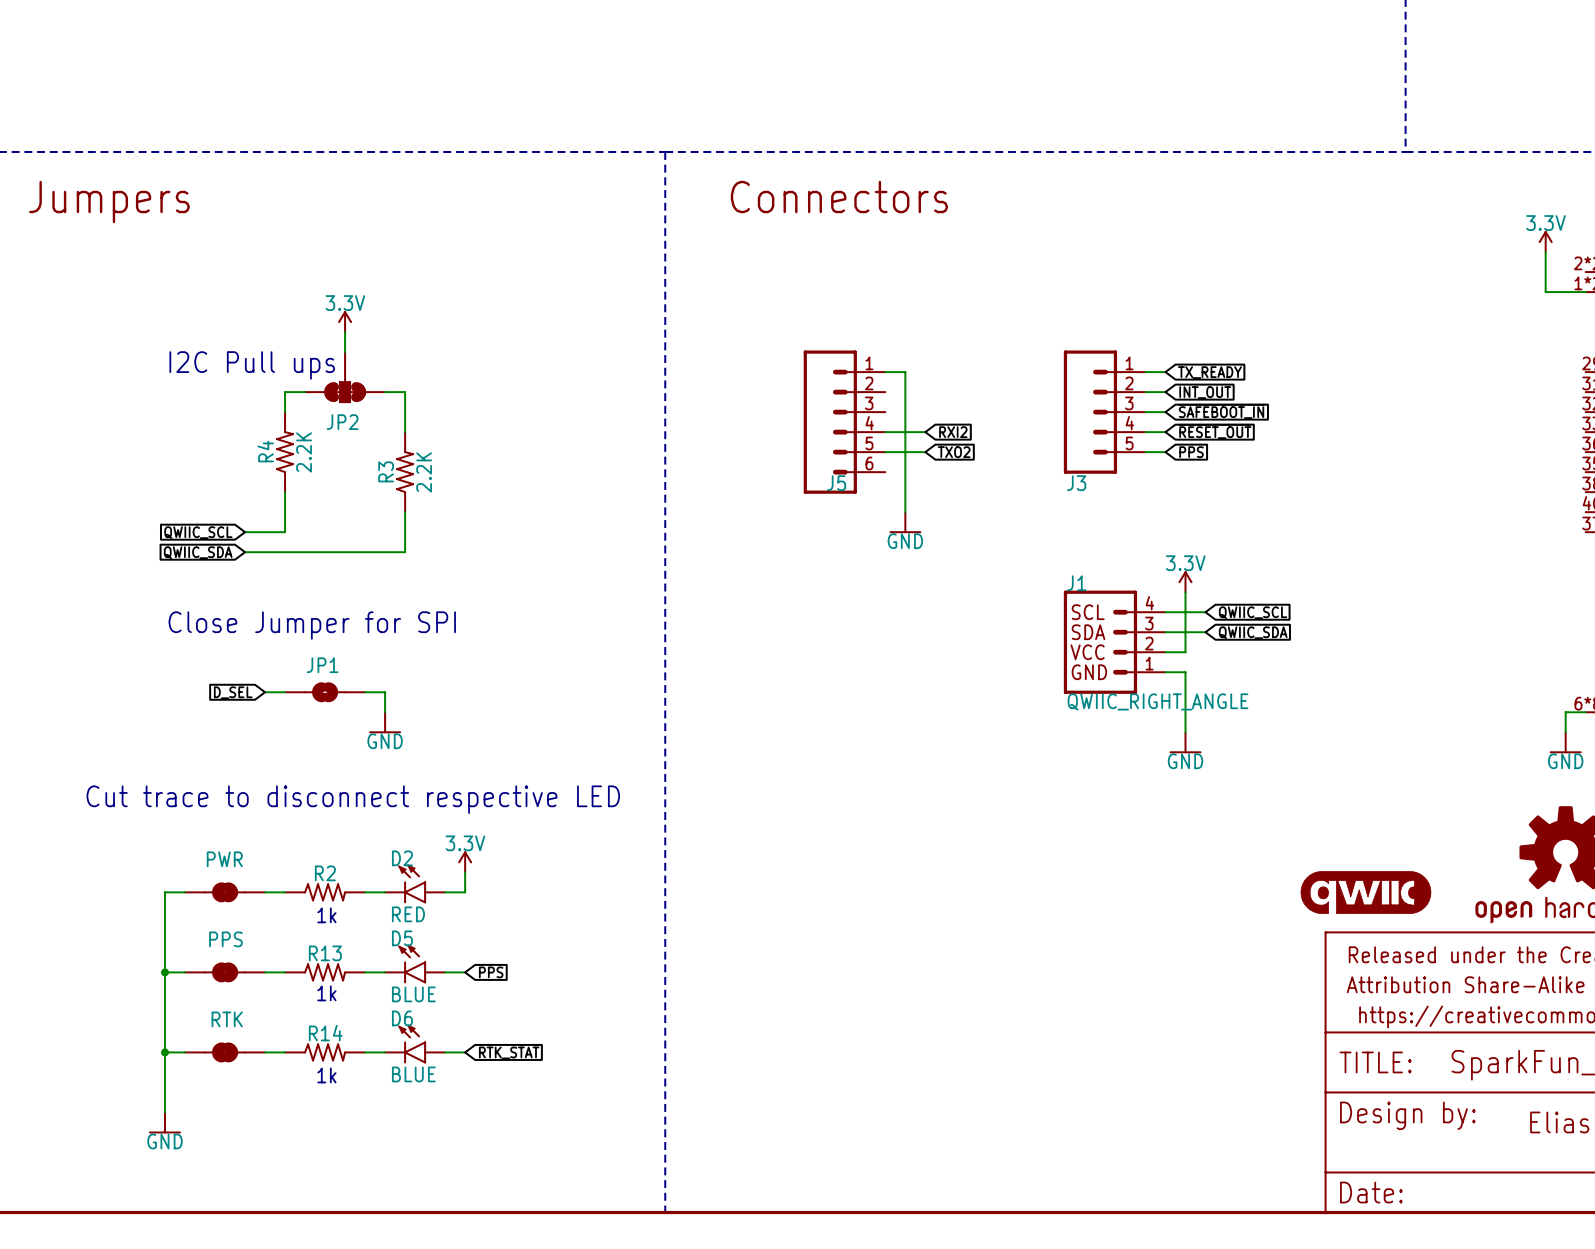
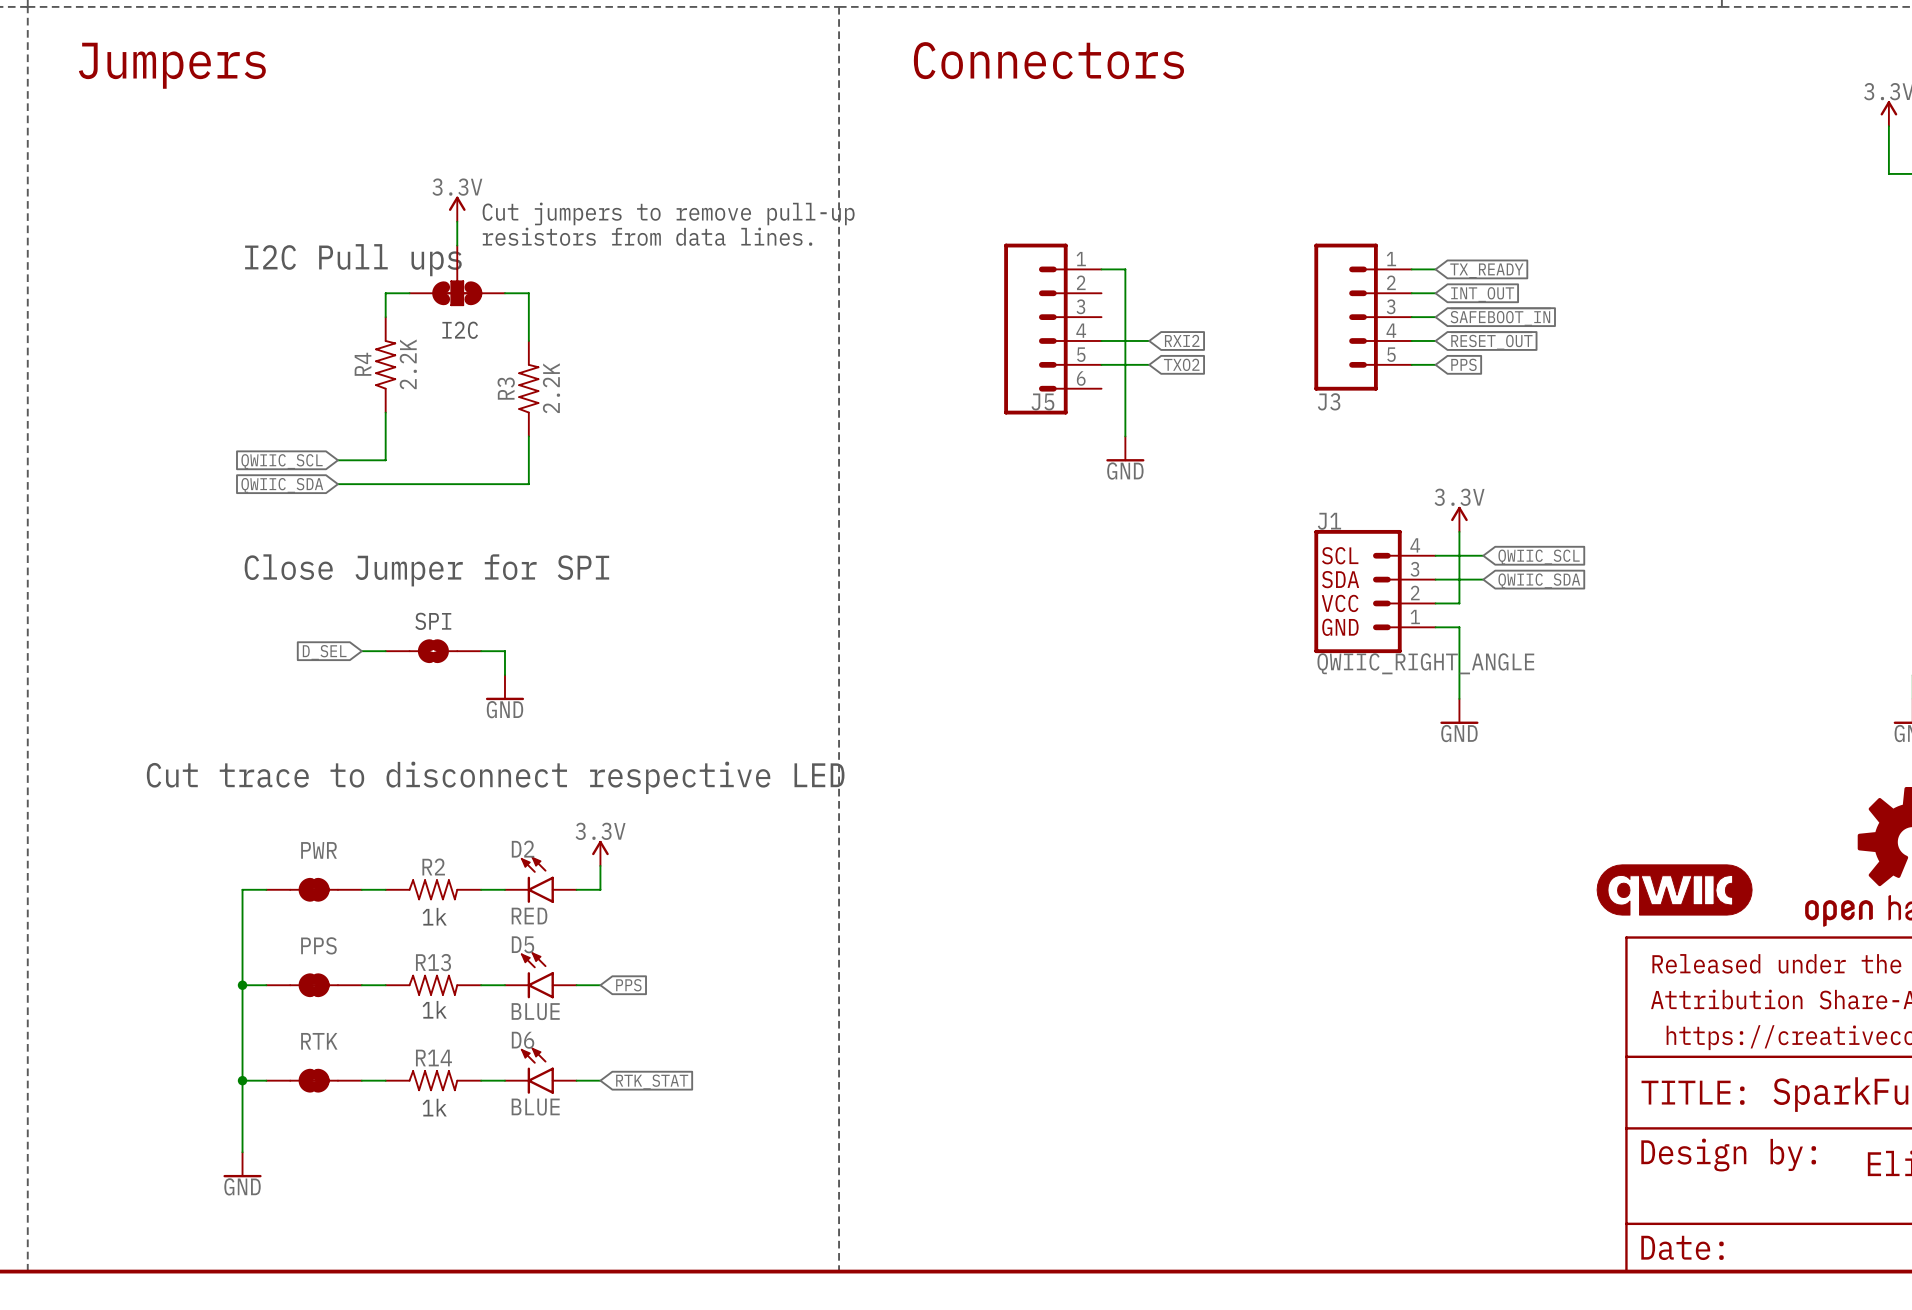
text: none -> Cut jumpers to remove pull-up (668, 213)
text: none -> resistors from data lines. (647, 236)
JP2 name: JP2 (342, 422) -> none
text: none -> I2C (460, 330)
JP1 name: JP1 (322, 665) -> none
text: none -> SPI (433, 621)

